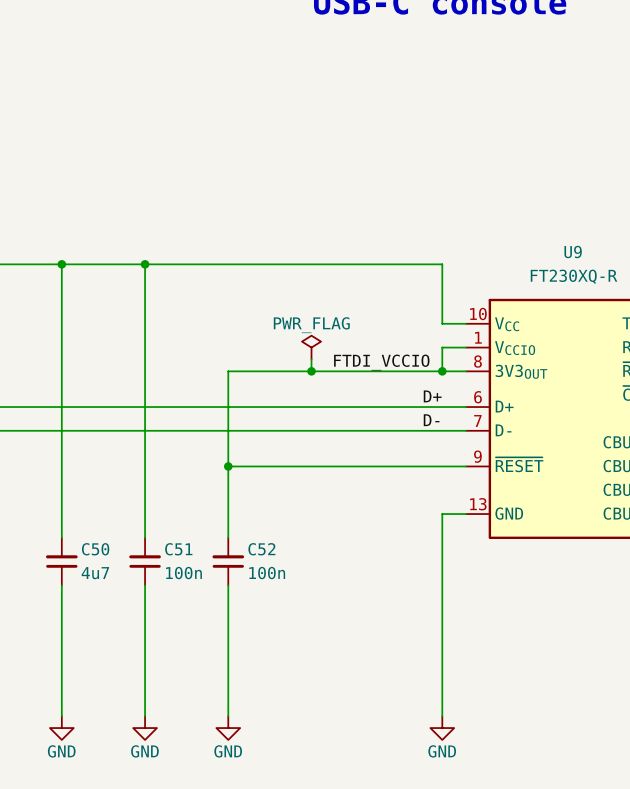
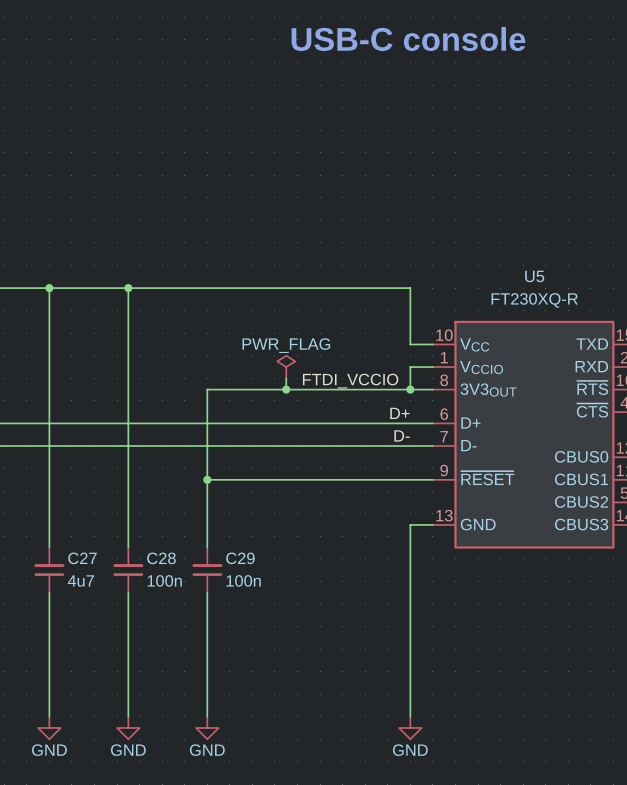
U9 name: U9 (573, 252) -> U5 (534, 276)
C50 name: C50 (95, 549) -> C27 (82, 558)
C51 name: C51 (178, 549) -> C28 (161, 558)
C52 name: C52 (261, 549) -> C29 (240, 558)

